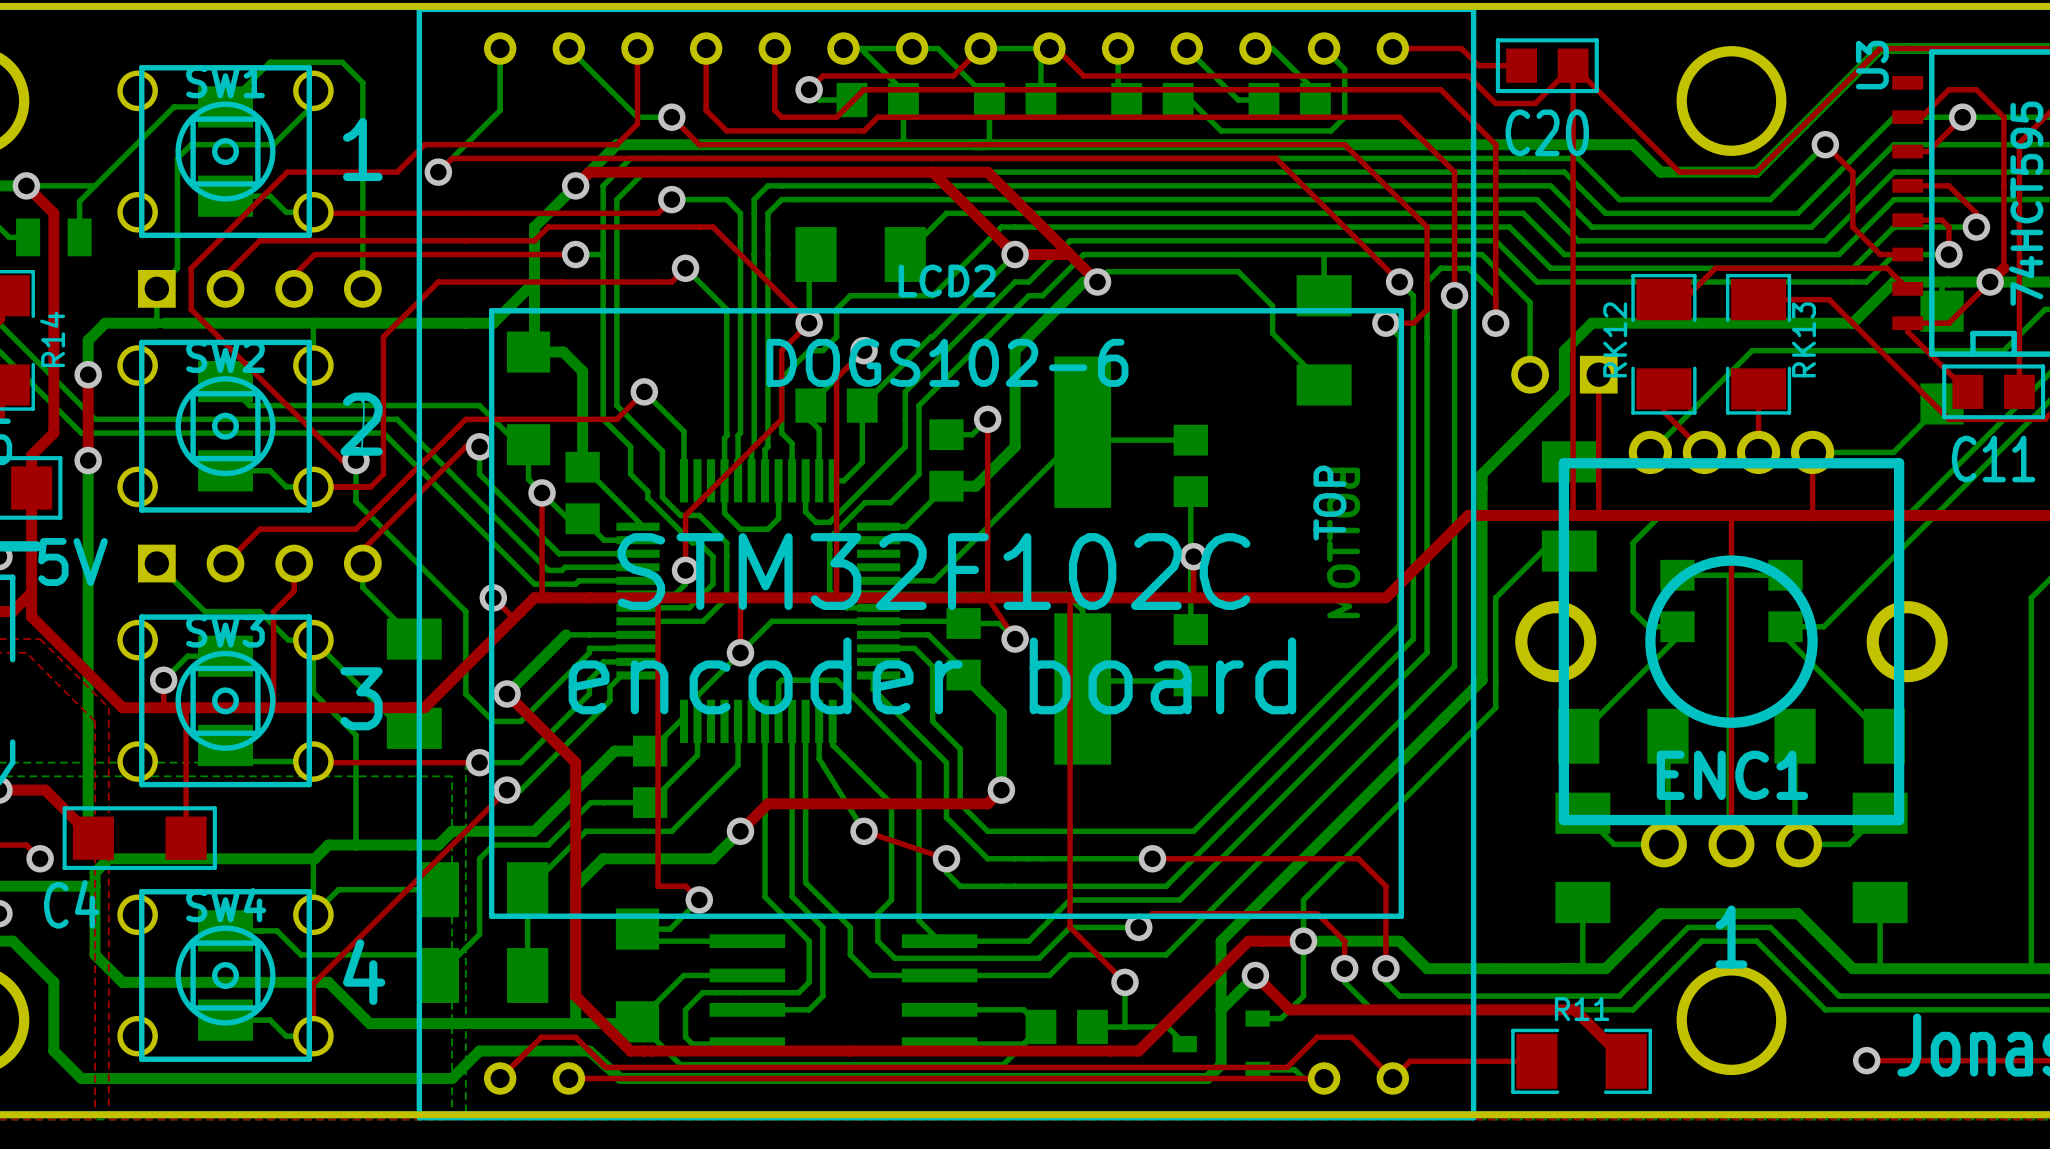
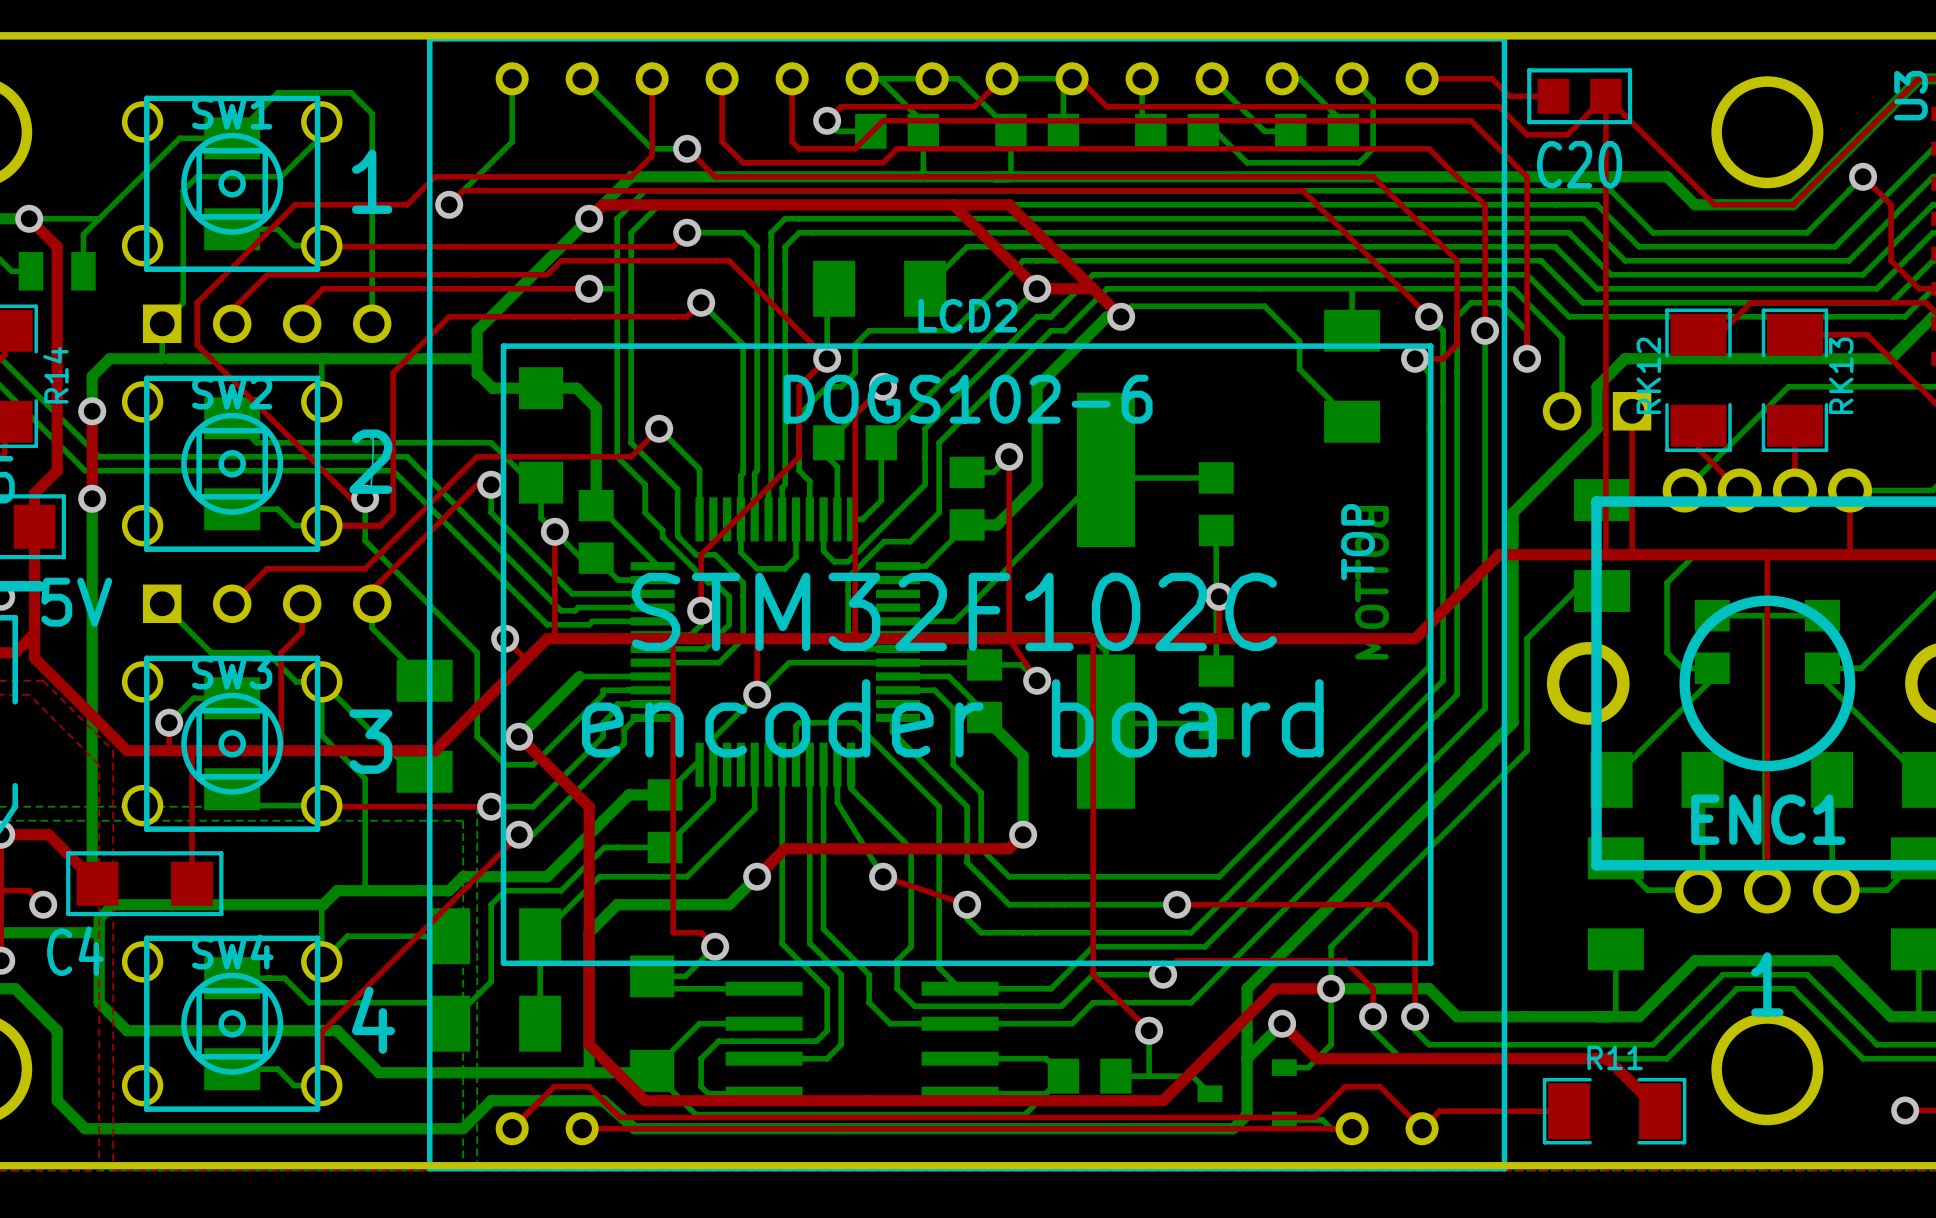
bottom track: (534, 227) (534, 346) (528, 352) -> (547, 260) (477, 330) (477, 374) (492, 388) (541, 388)
bottom track: (534, 282) (493, 323) (465, 323) -> none

